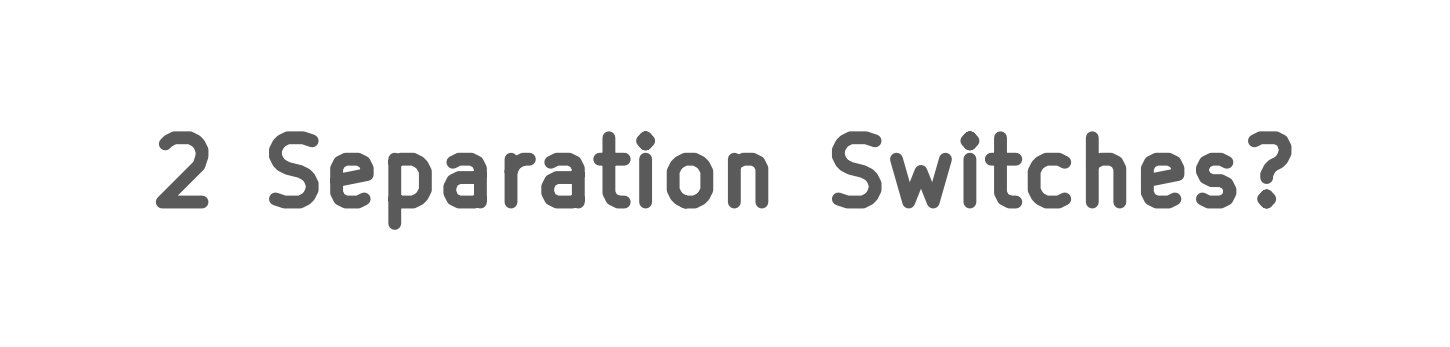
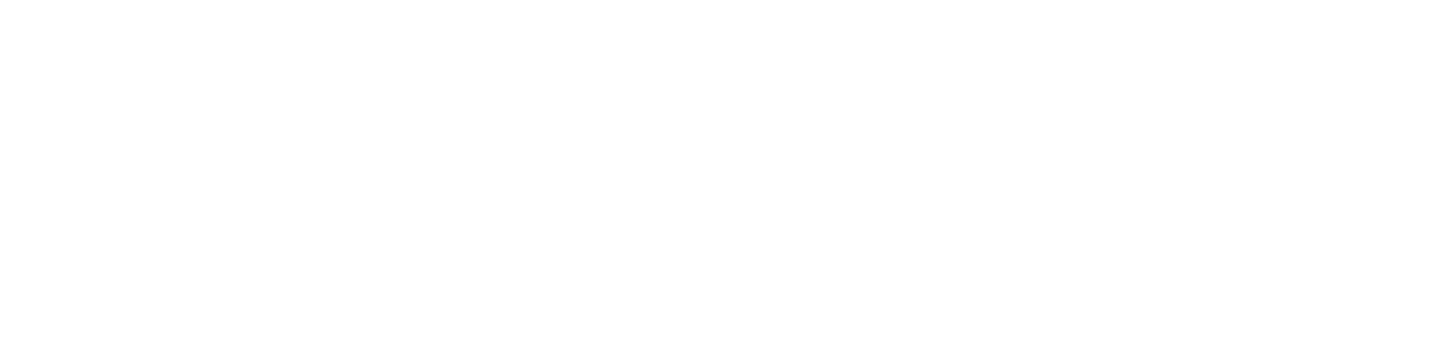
text: 2 Separation Switches? (723, 180) -> none

